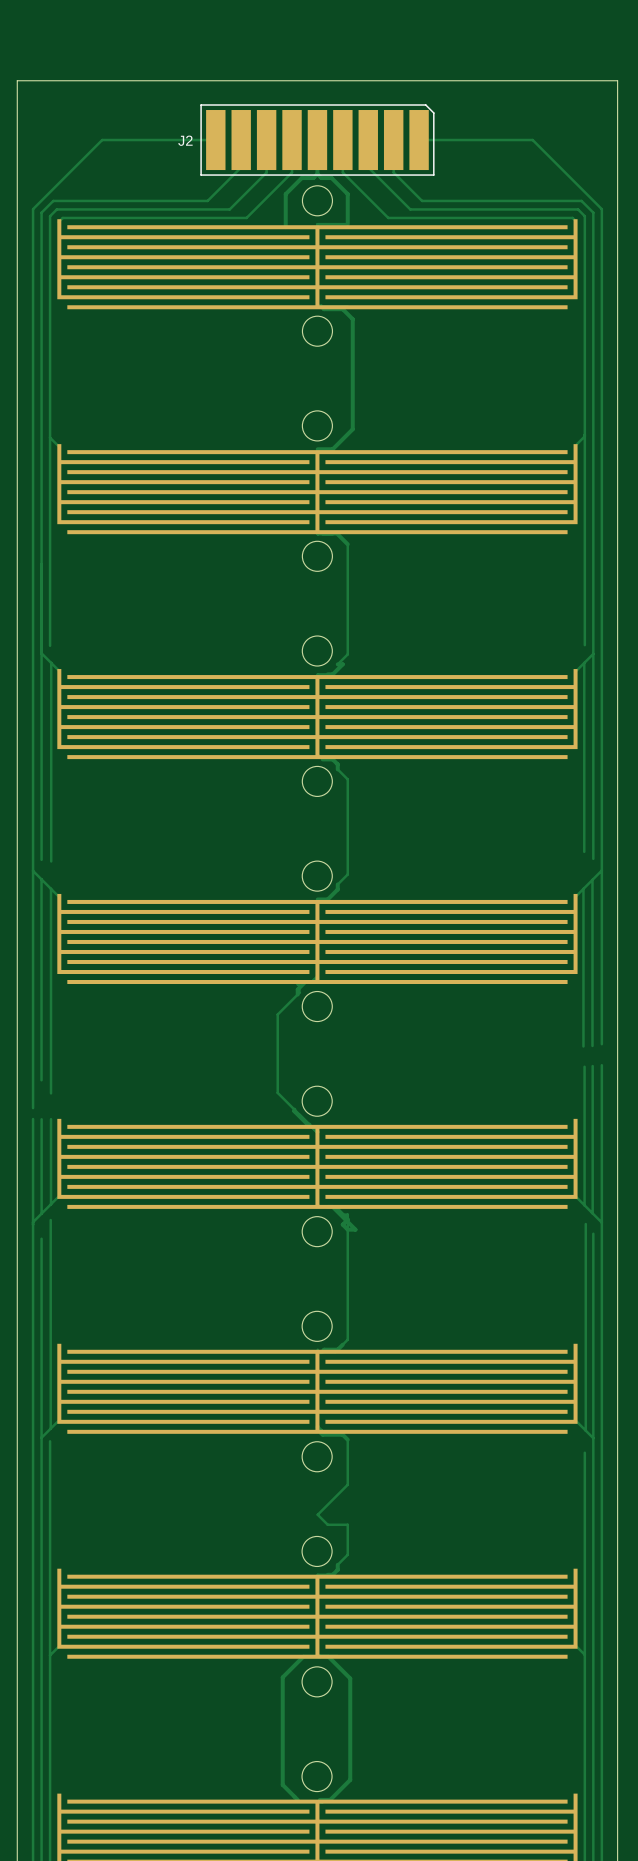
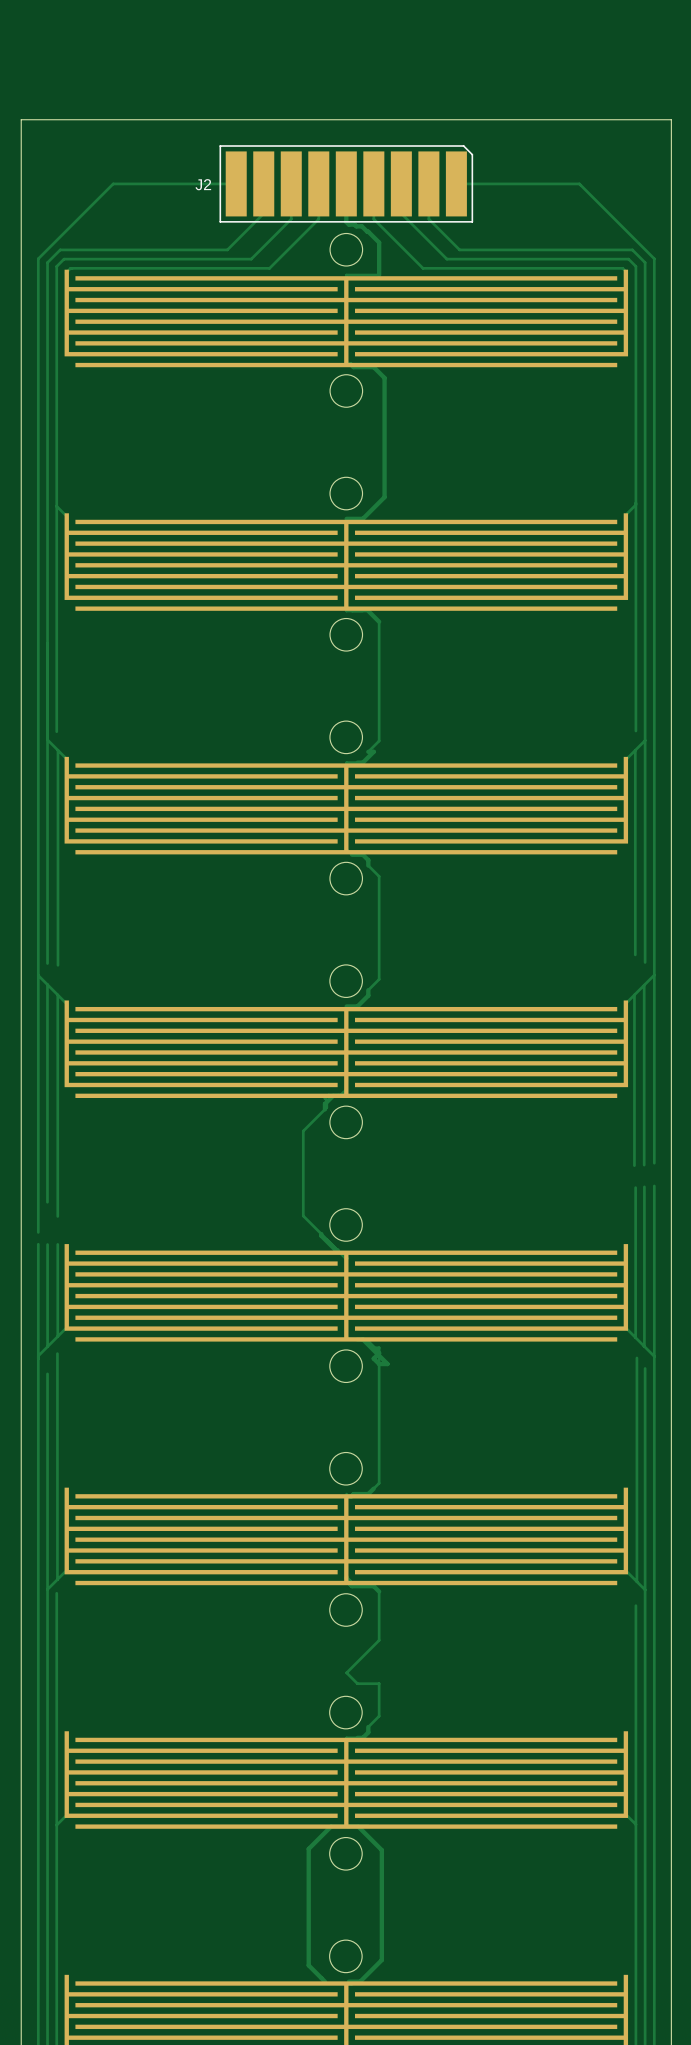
track: (337, 184) (331, 178) (321, 178) (317, 174) (313, 178) (301, 178) (285, 194) (285, 227) -> (368, 231) (361, 226) (348, 224) (346, 220)

